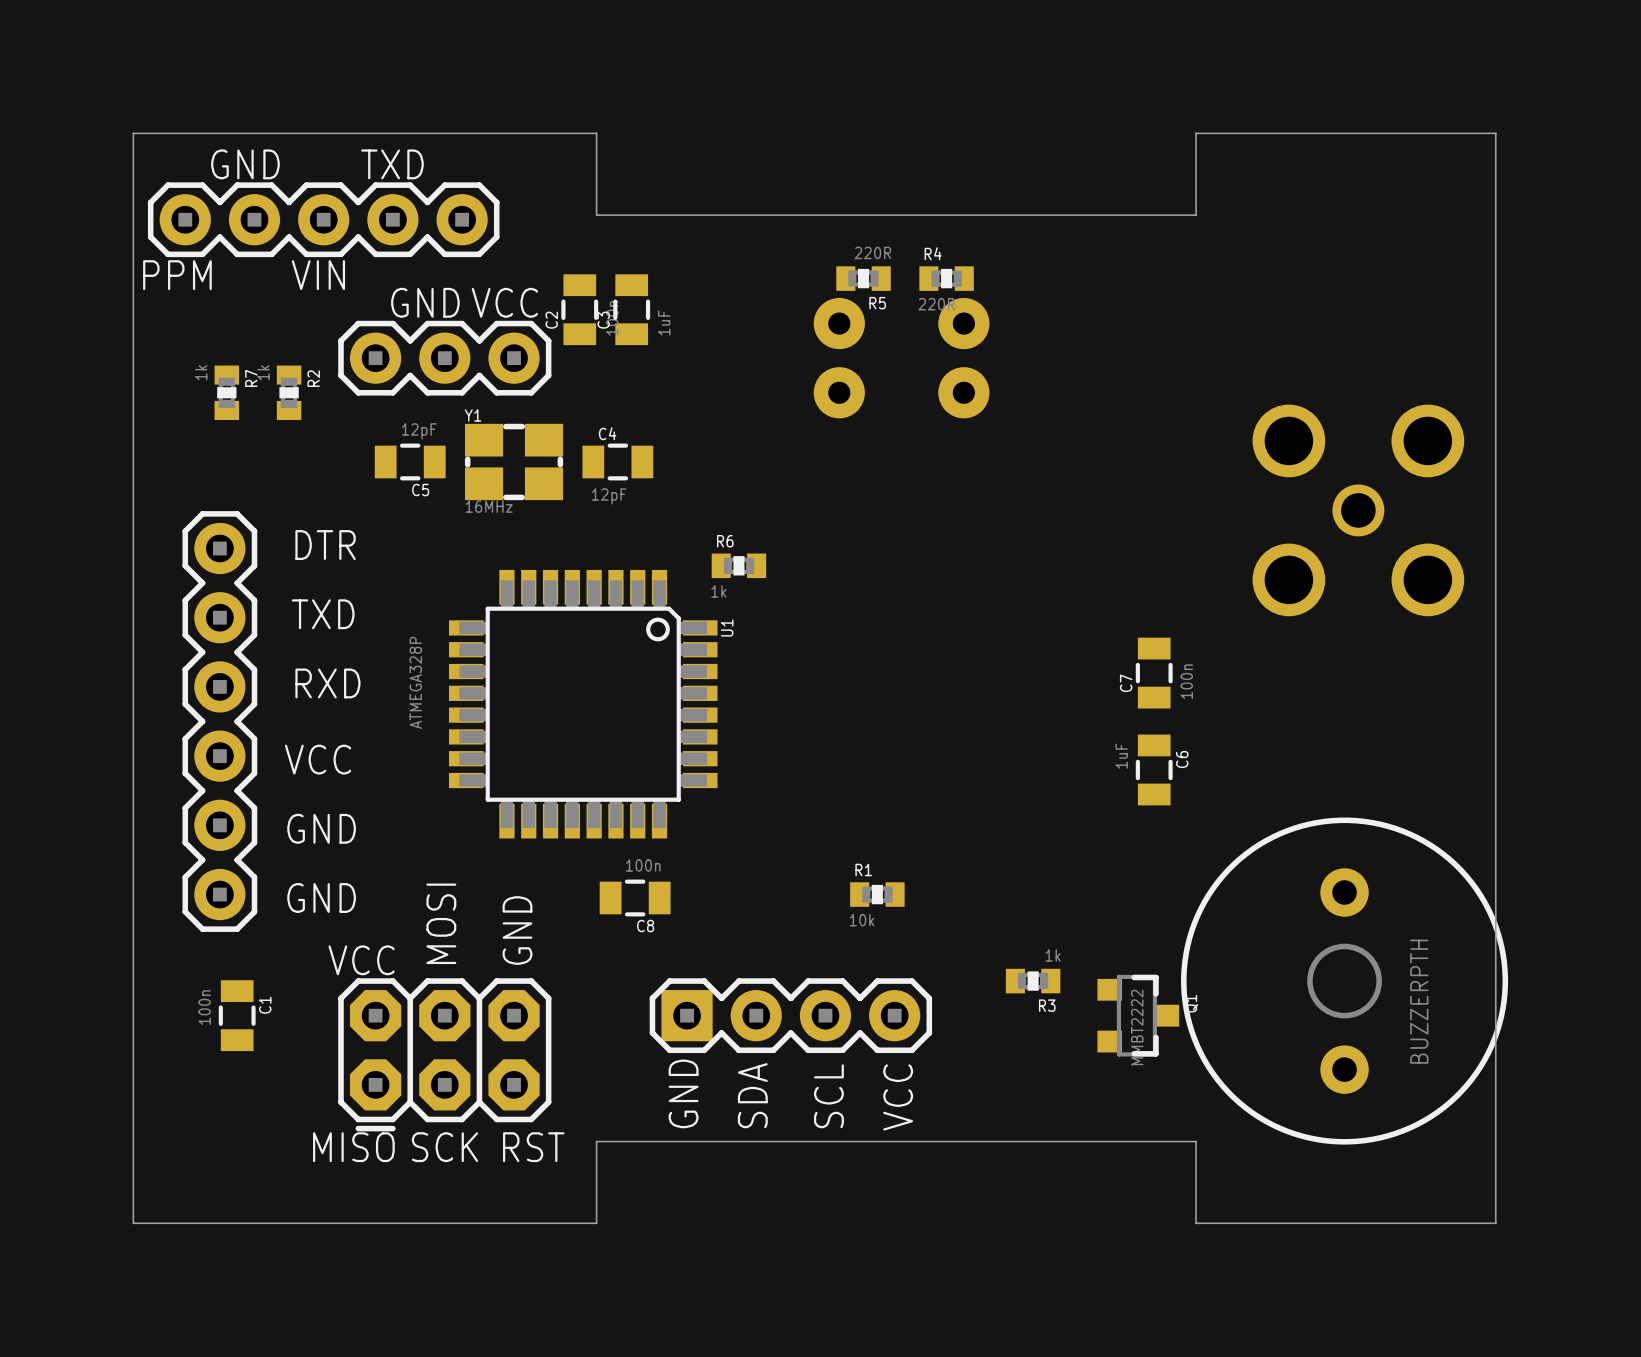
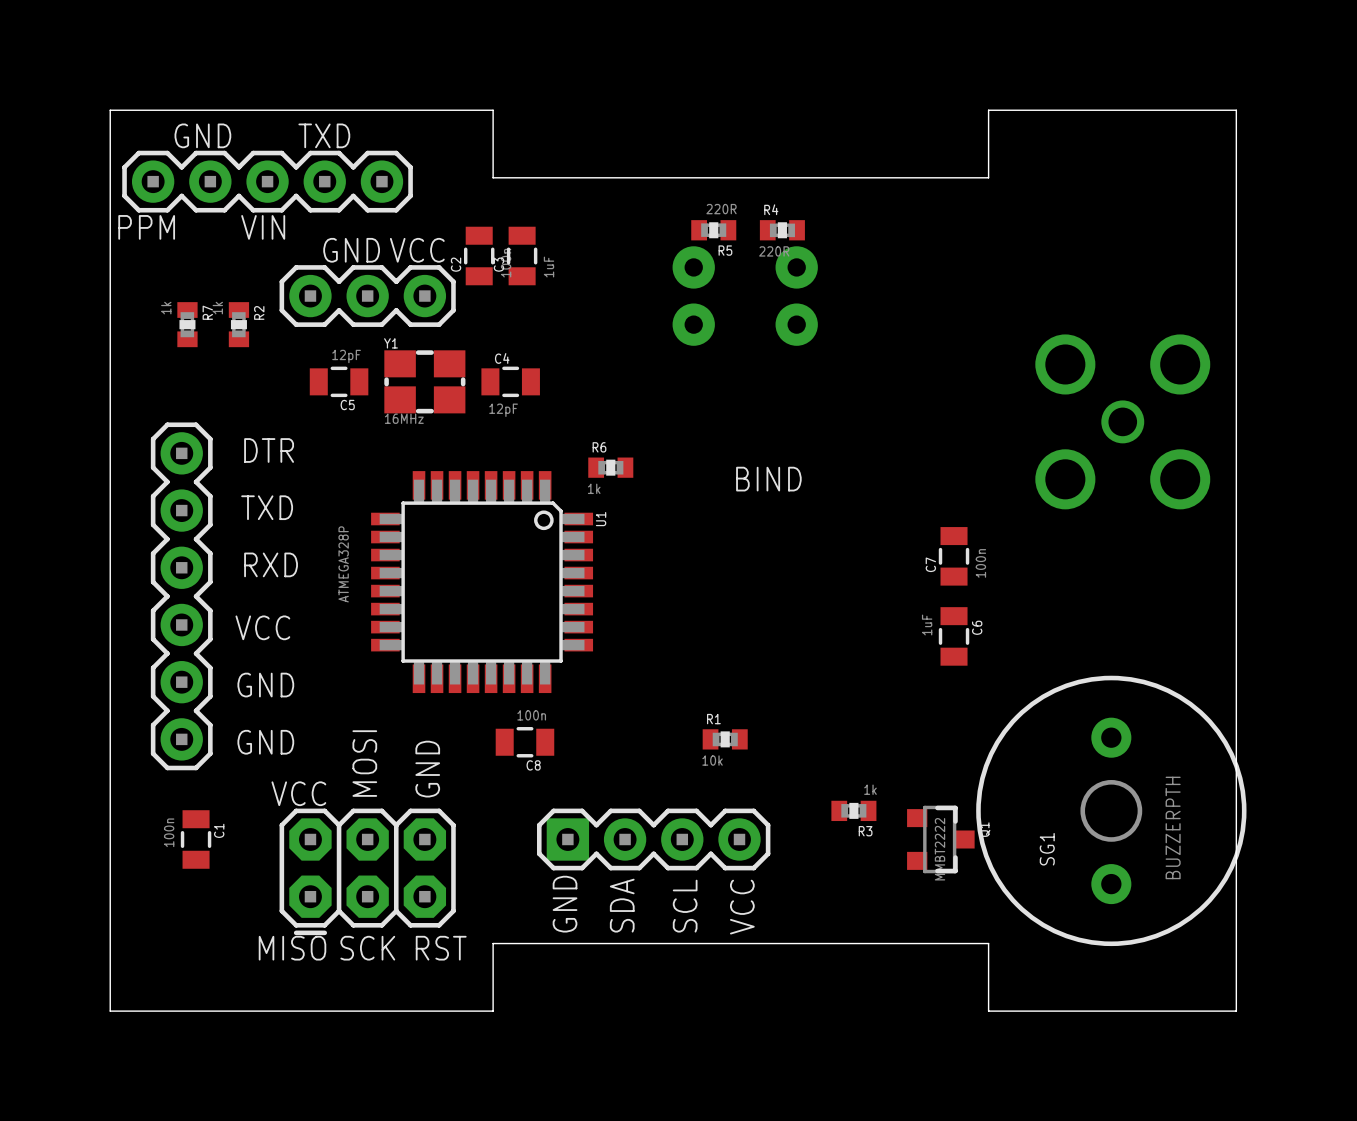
text: none -> BIND (768, 479)
SG1 name: none -> SG1 (1047, 849)

